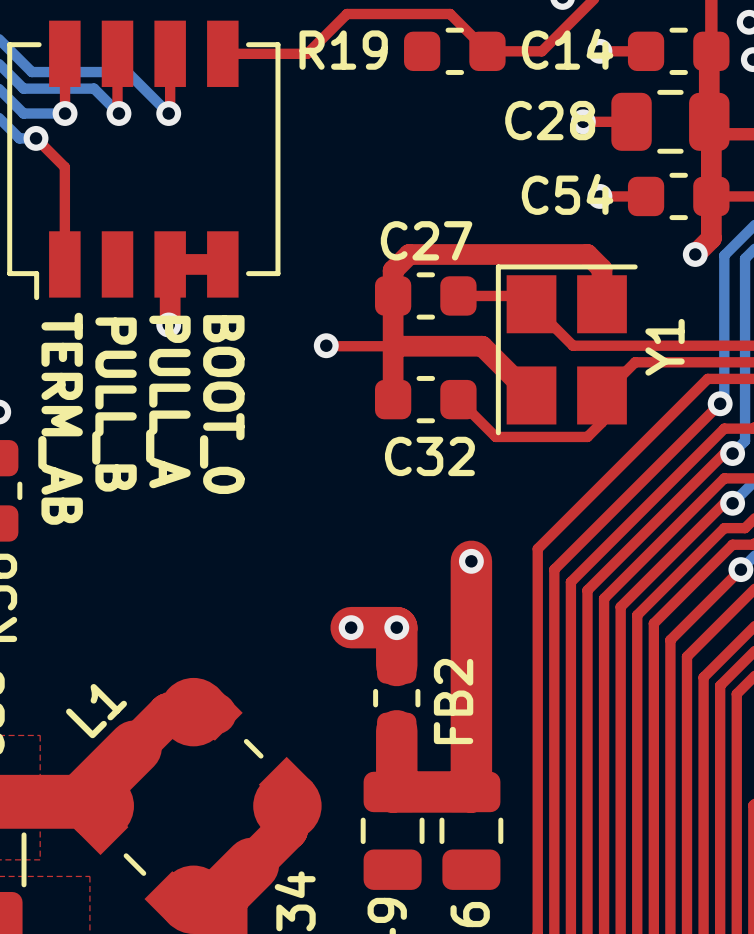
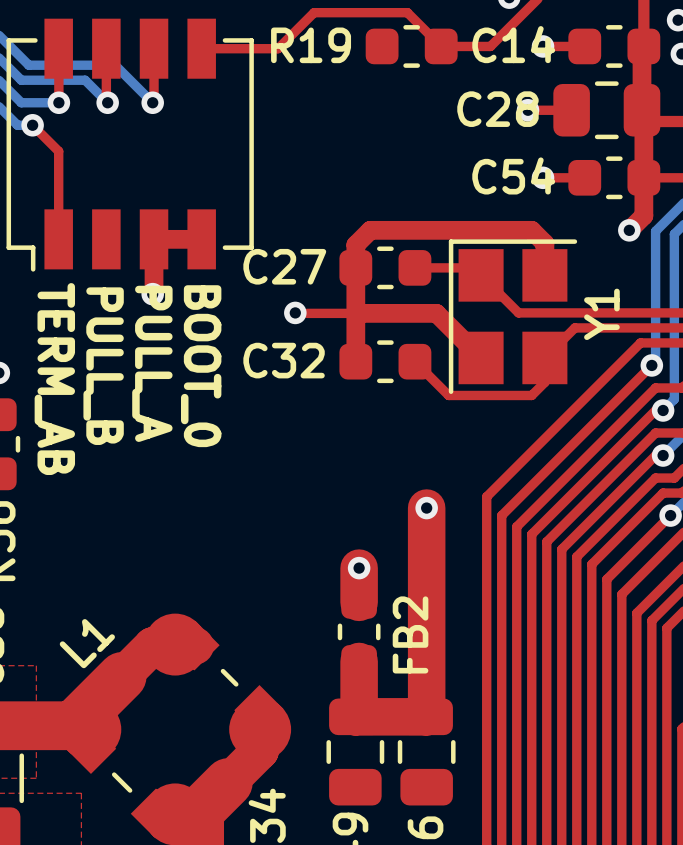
C27 name position: C27 (426, 240) -> C27 (284, 266)
C32 name position: C32 (429, 456) -> C32 (284, 360)
top track: (351, 627) (396, 627) -> none
via: (351, 627) -> none

